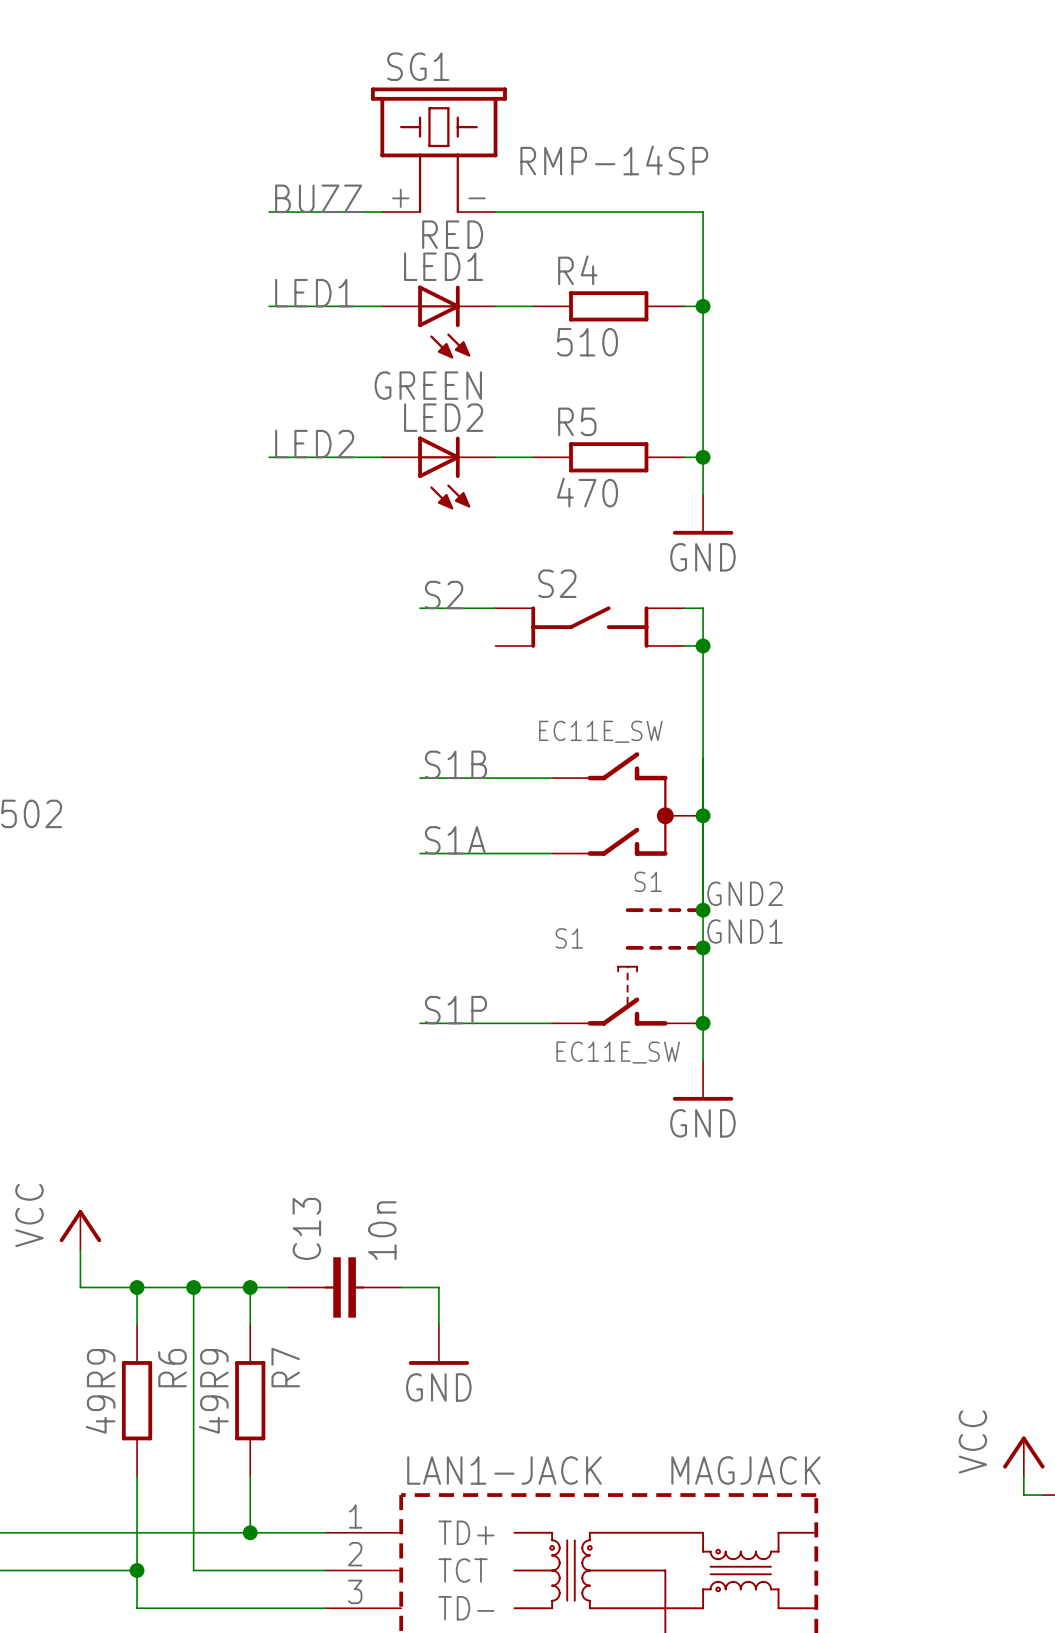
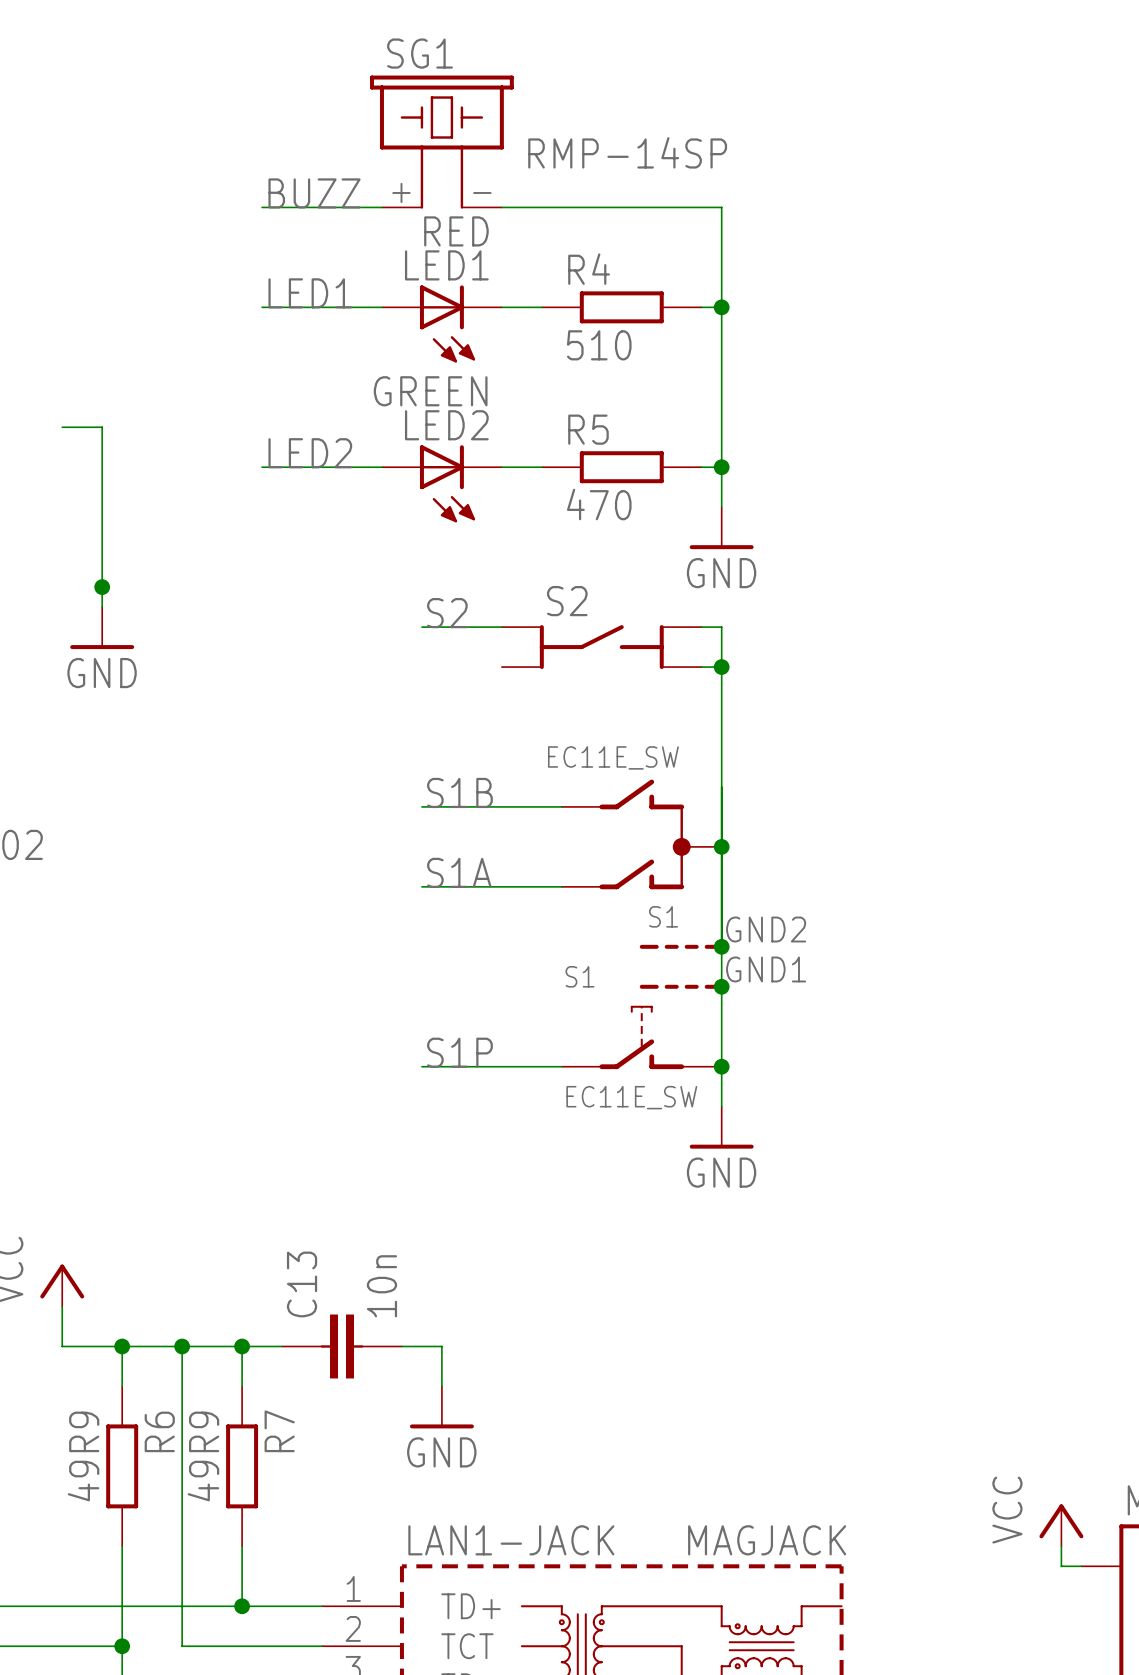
wire: none -> (62, 427) (102, 427) (102, 607)
junction: none -> (102, 587)
power symbol: none -> GND (102, 628)

